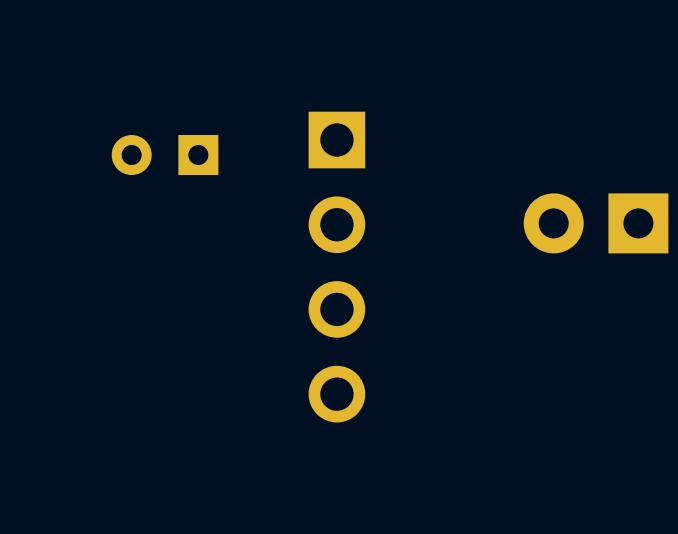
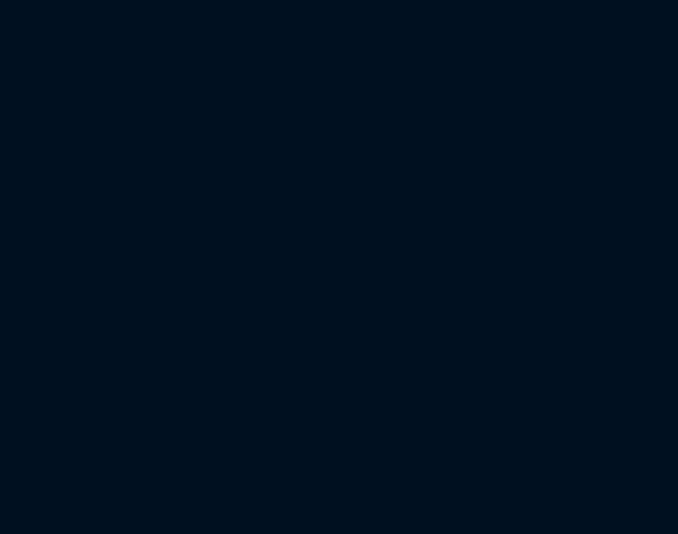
part: (165, 155) -> none
part: (596, 223) -> none
part: (336, 267) -> none

